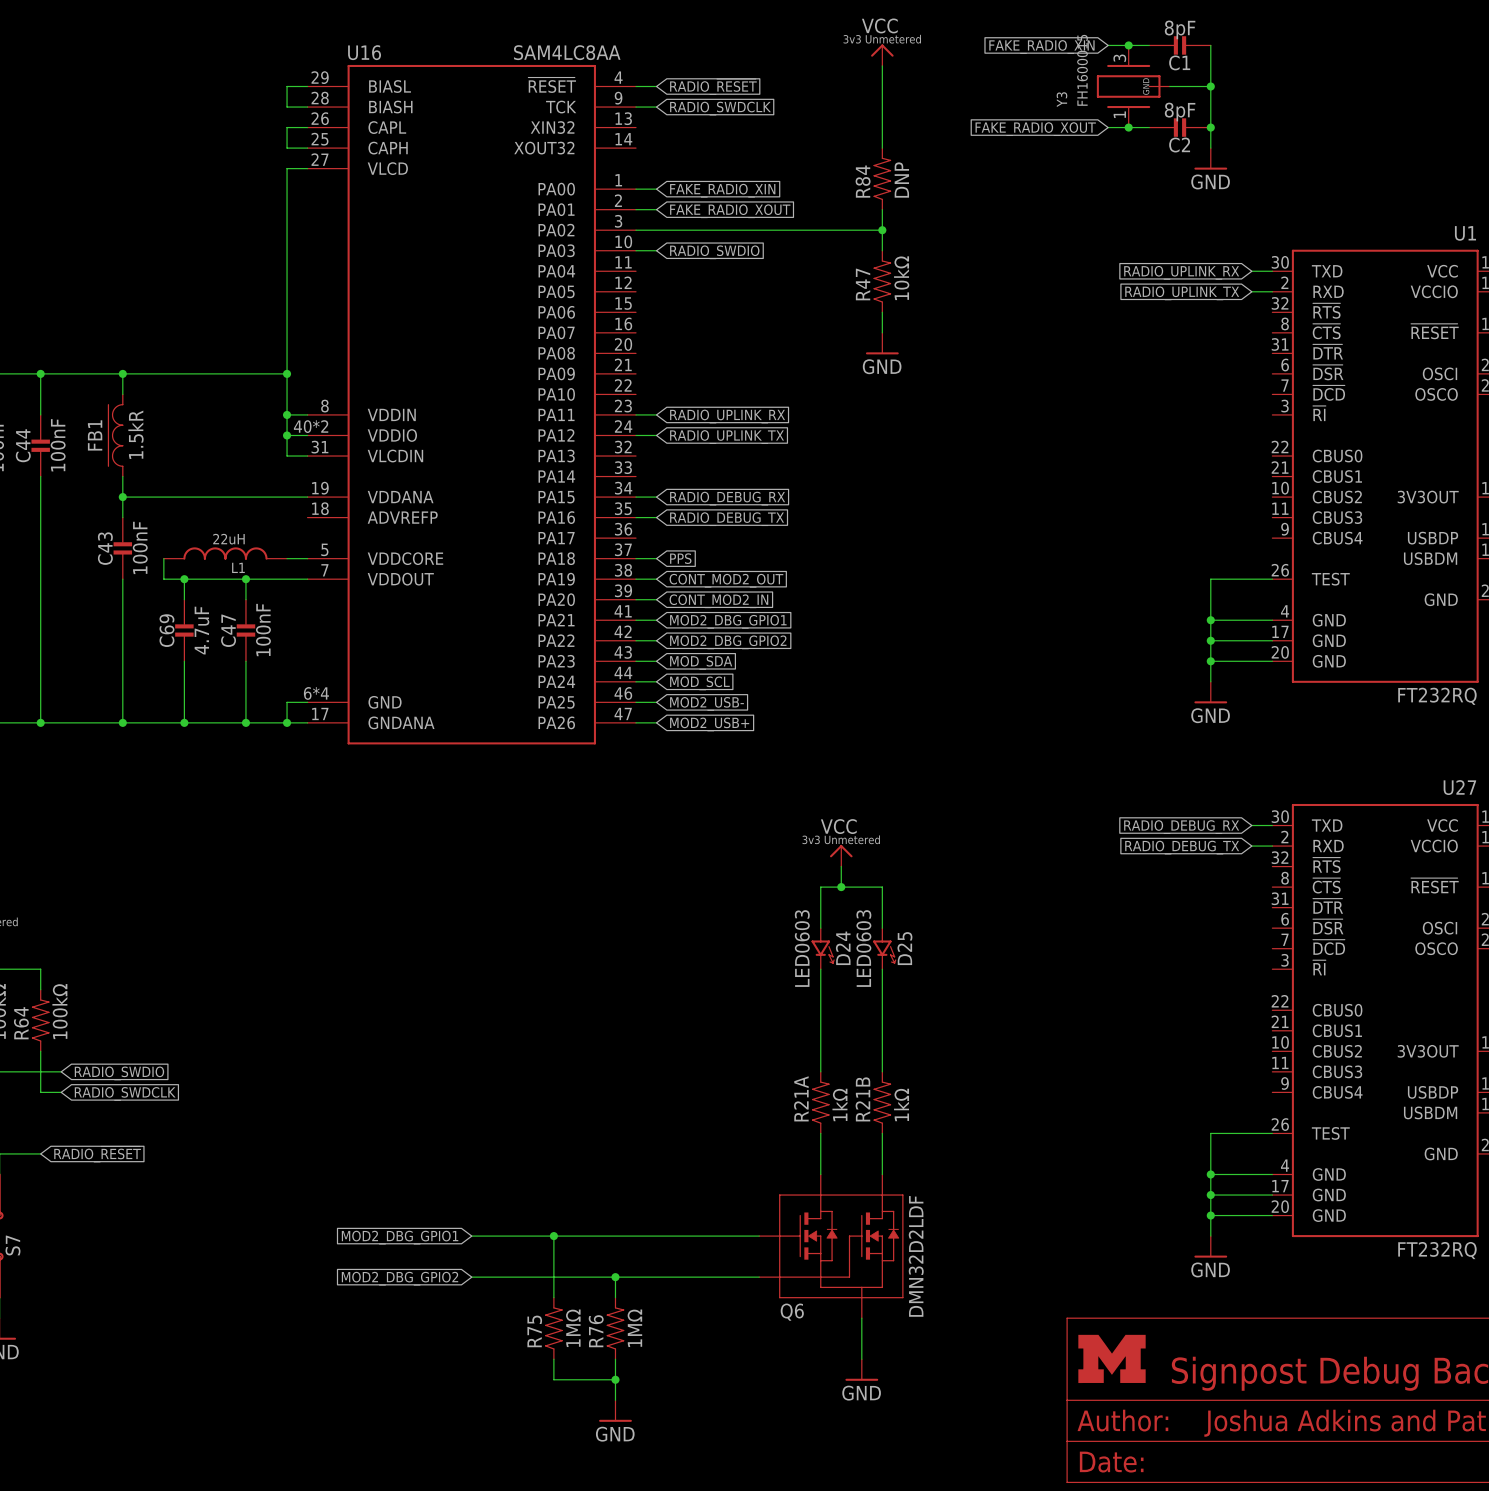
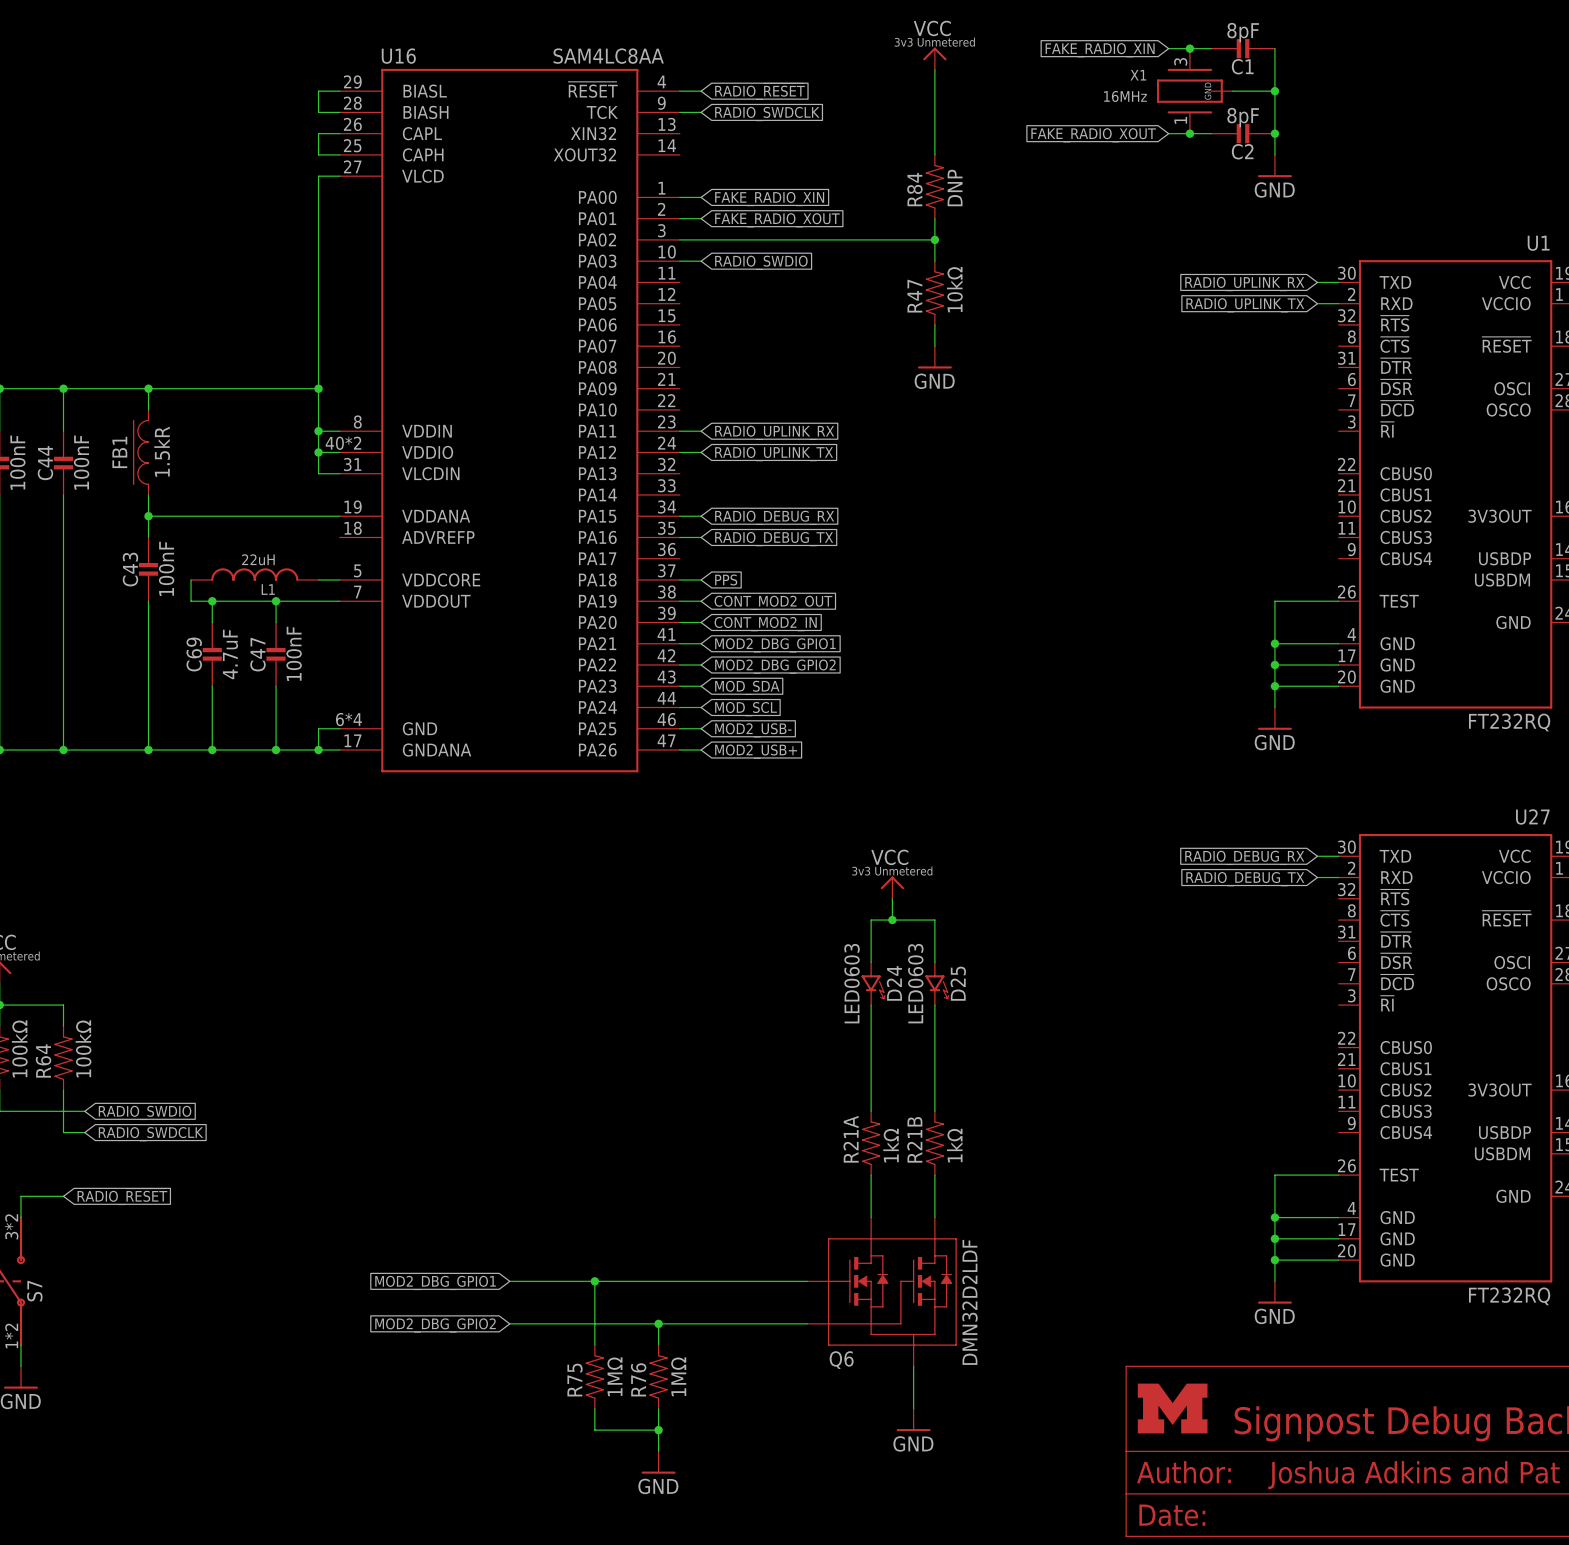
Y3 value: FH1600015 (1082, 70) -> 16MHz (1125, 96)
Y3 name: Y3 (1061, 99) -> X1 (1138, 75)

